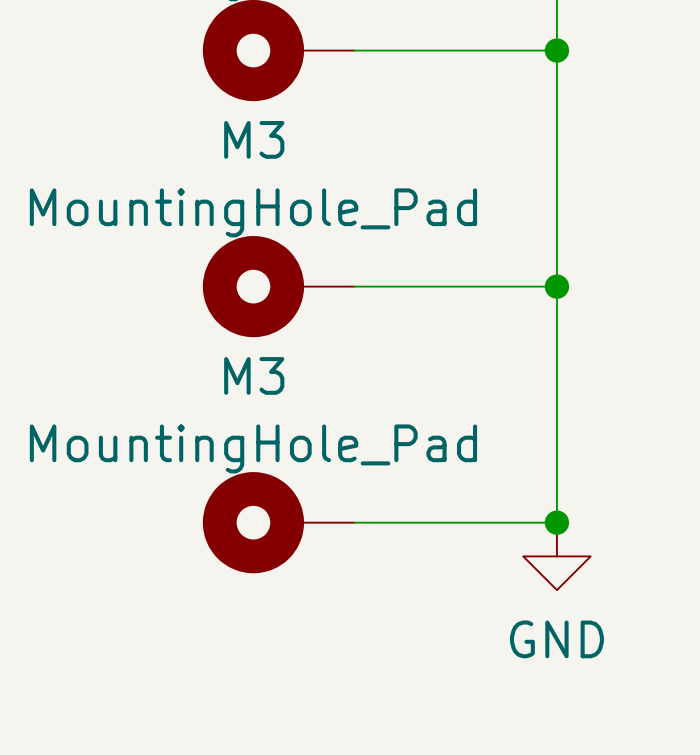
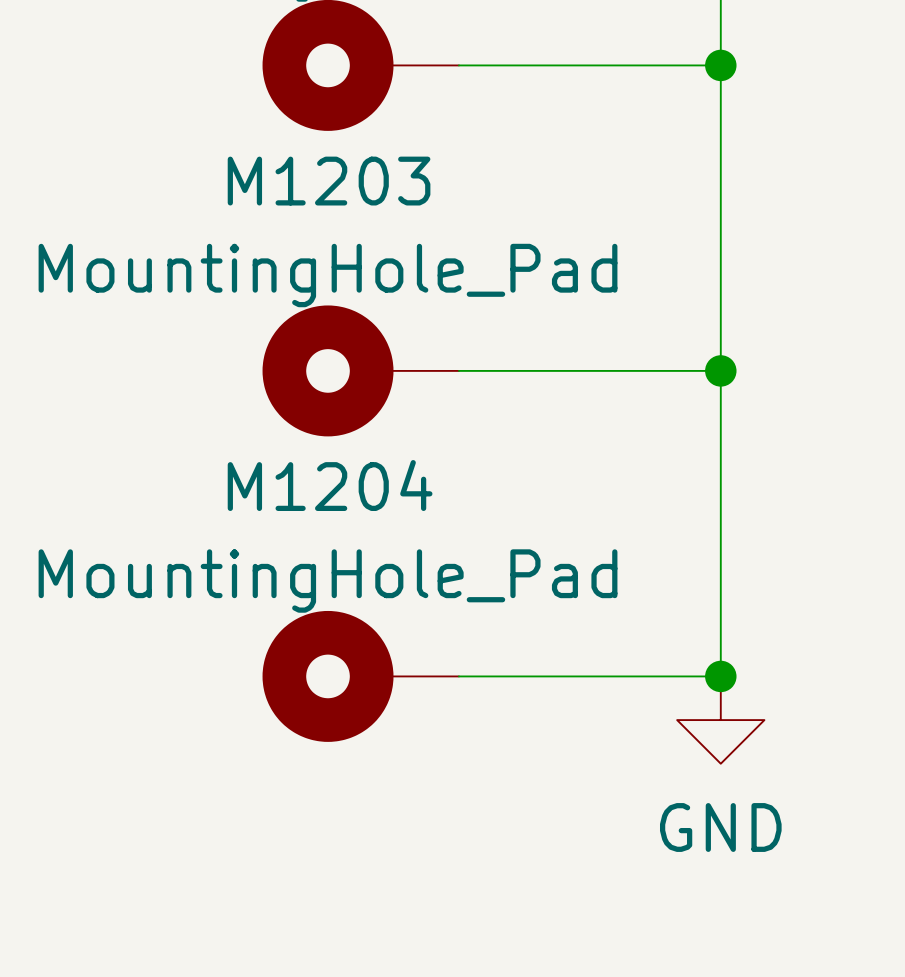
M3 name: M3 (254, 139) -> M1203 (329, 181)
M3 name: M3 (254, 375) -> M1204 (330, 485)

